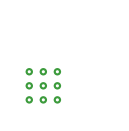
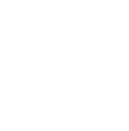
part: (43, 85) -> none

